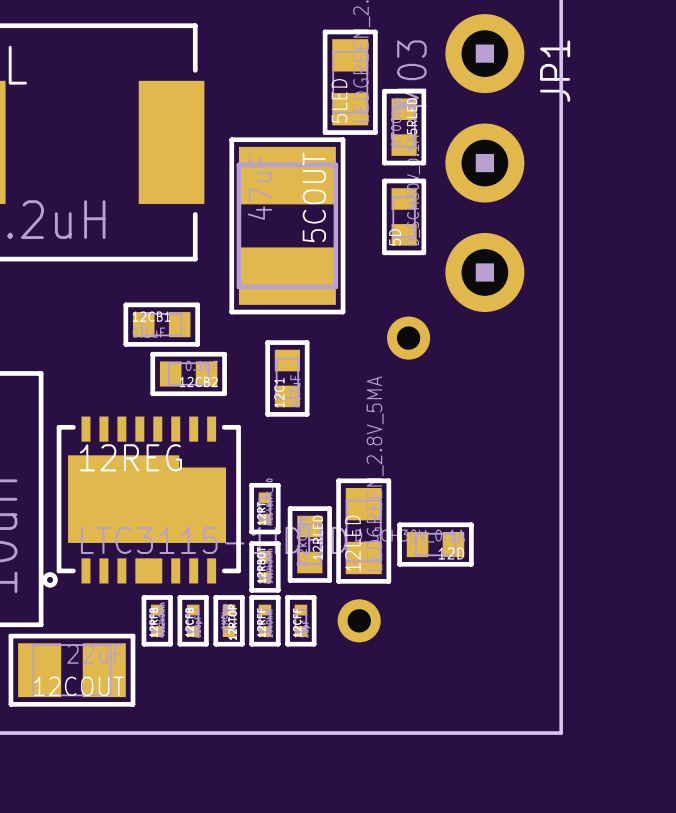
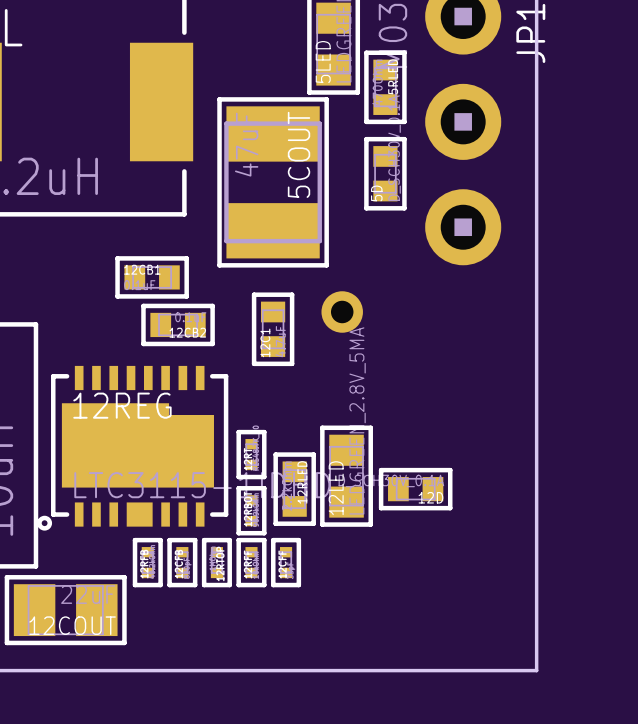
part position: (408, 338) -> (342, 311)
part: (359, 620) -> none

